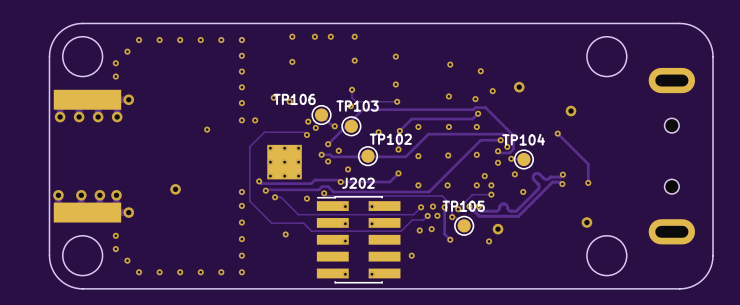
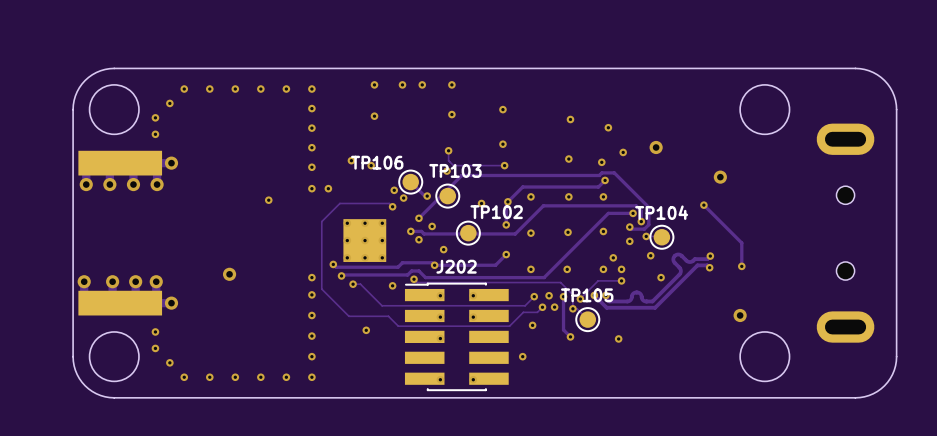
via: (431, 229) -> none
via: (498, 229) -> none

